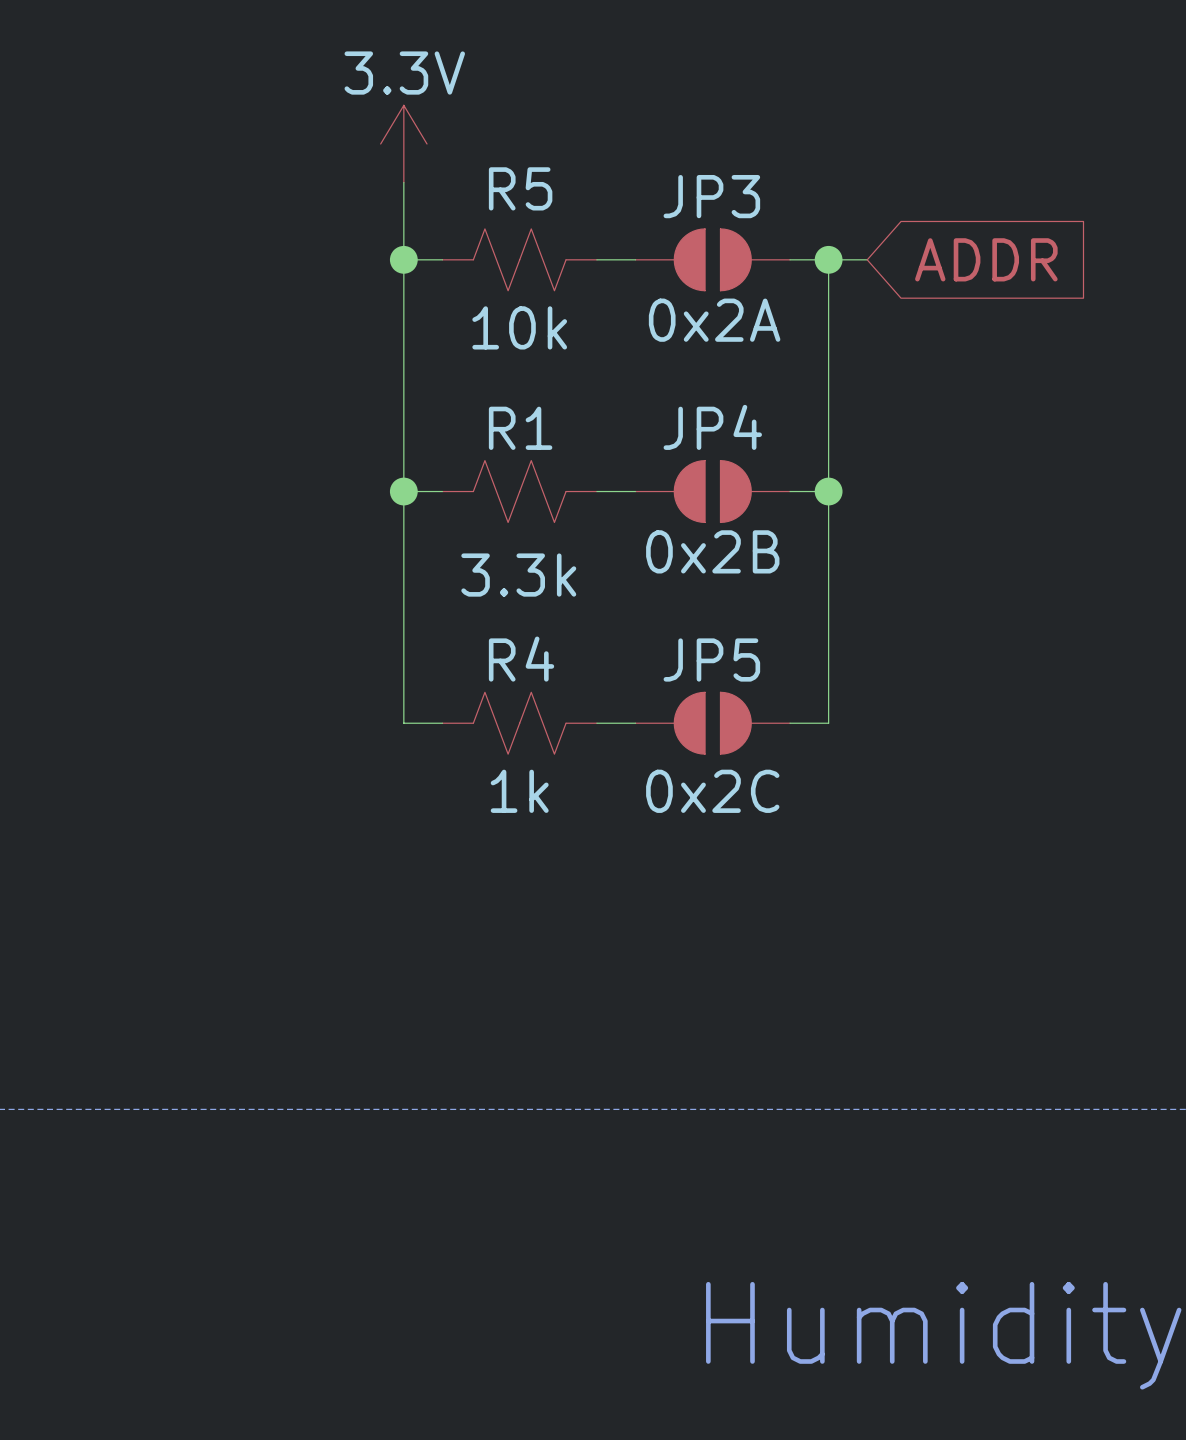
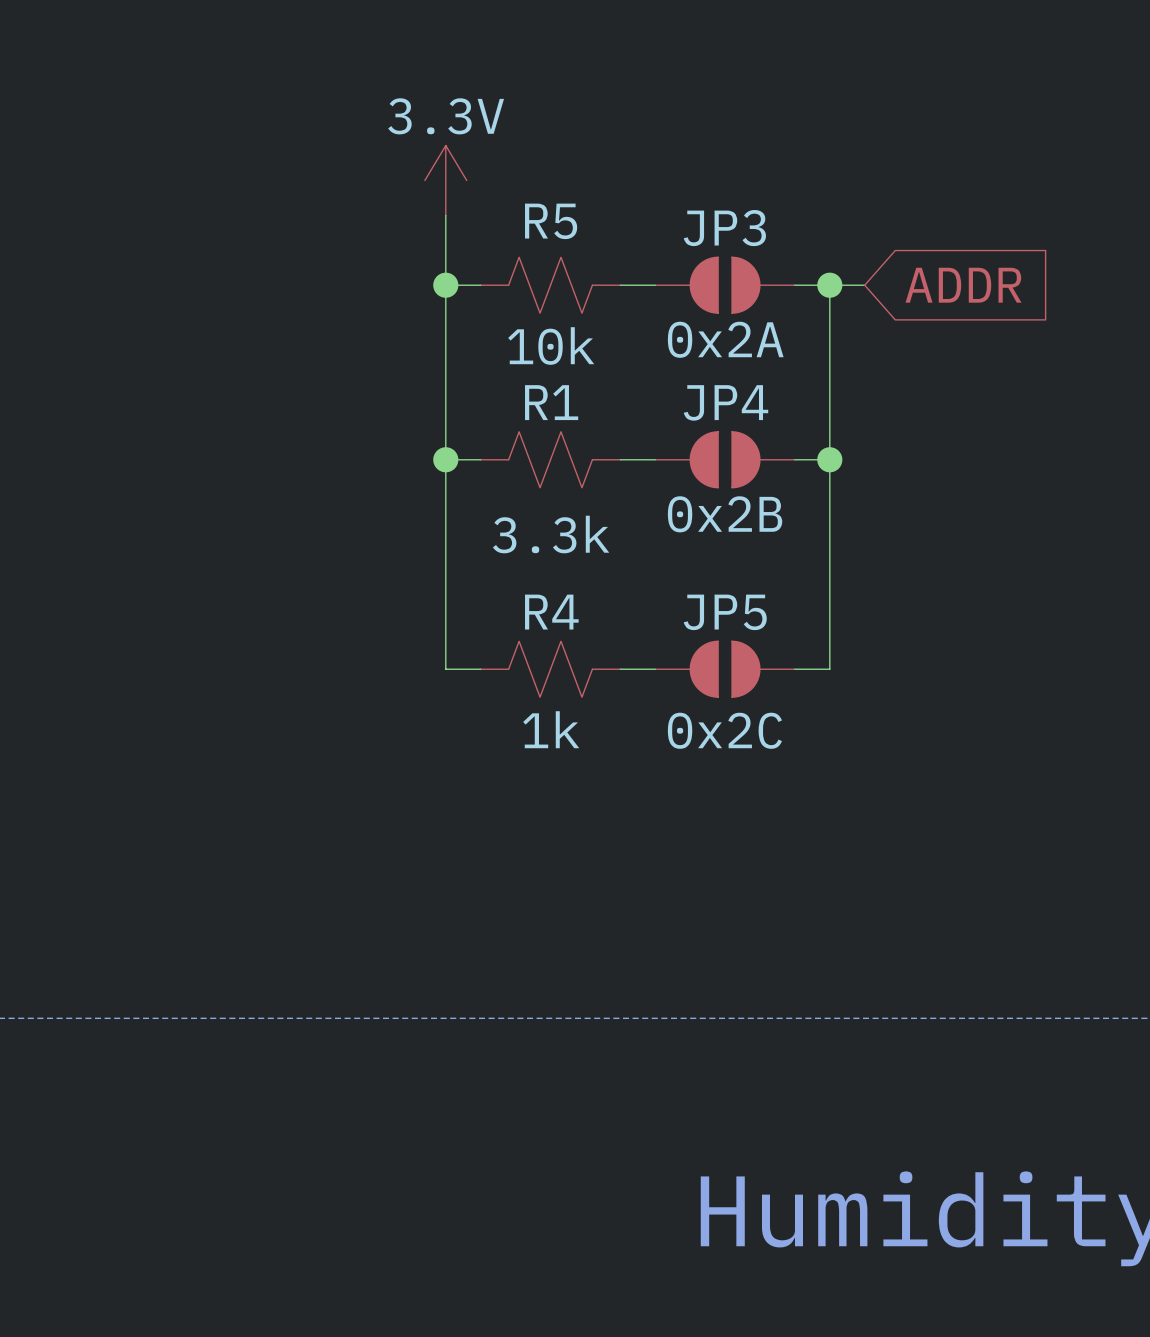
power symbol position: 3.3V (403, 143) -> 3.3V (445, 180)
wire: (403, 259) (442, 259) -> (445, 285) (480, 285)
junction position: (403, 259) -> (445, 285)
R5 position: (519, 259) -> (550, 285)
wire: (596, 259) (635, 259) -> (620, 285) (655, 285)
JP3 position: (712, 259) -> (725, 285)
wire: (790, 259) (867, 259) -> (794, 285) (864, 285)
wire: (828, 259) (828, 298) -> none
junction position: (828, 259) -> (829, 285)
global label position: ADDR (986, 259) -> ADDR (963, 285)

